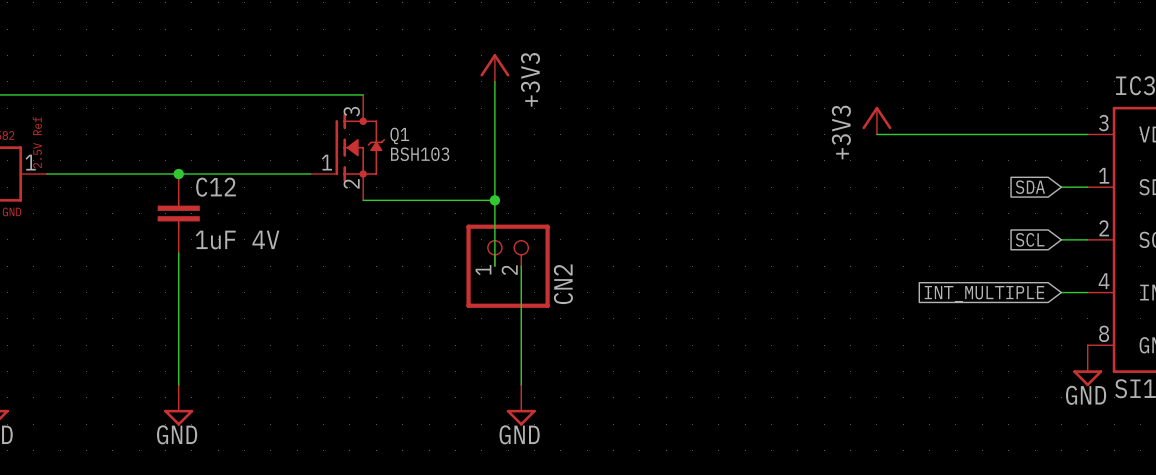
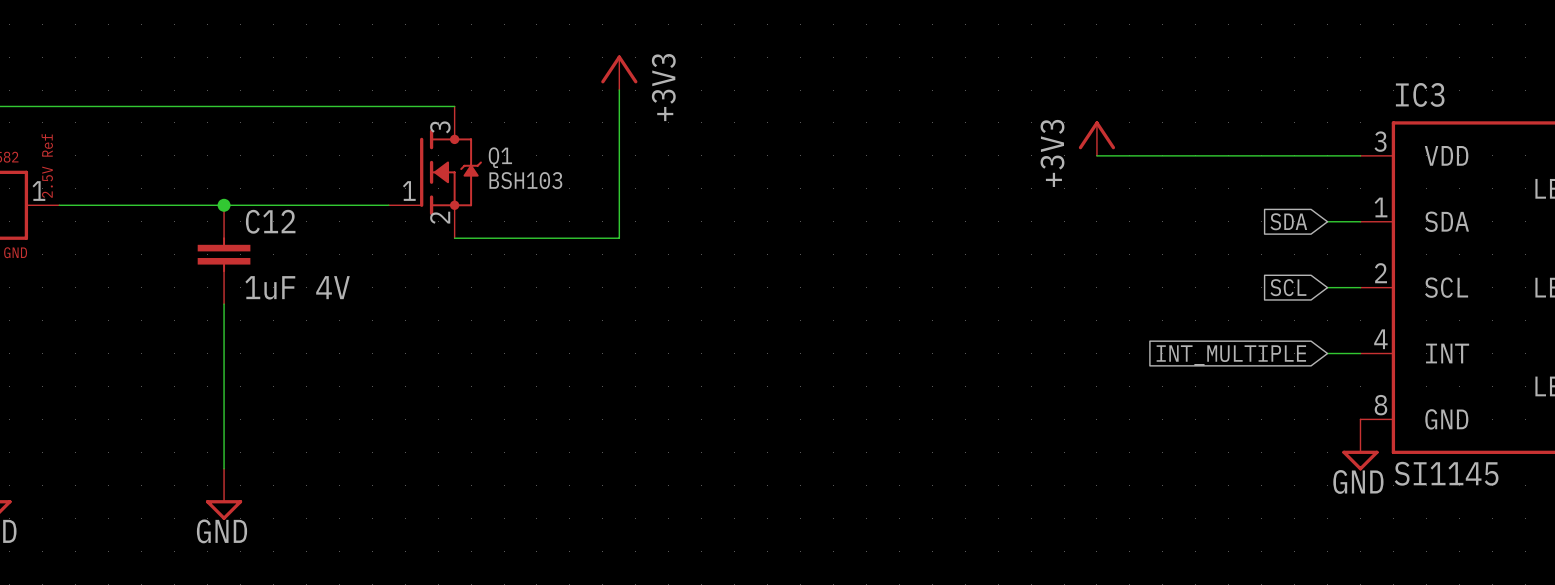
wire: (494, 200) (494, 266) -> none
junction: (494, 200) -> none
CN2: (508, 266) -> none
wire: (521, 266) (521, 384) -> none
power symbol: GND (521, 405) -> none

